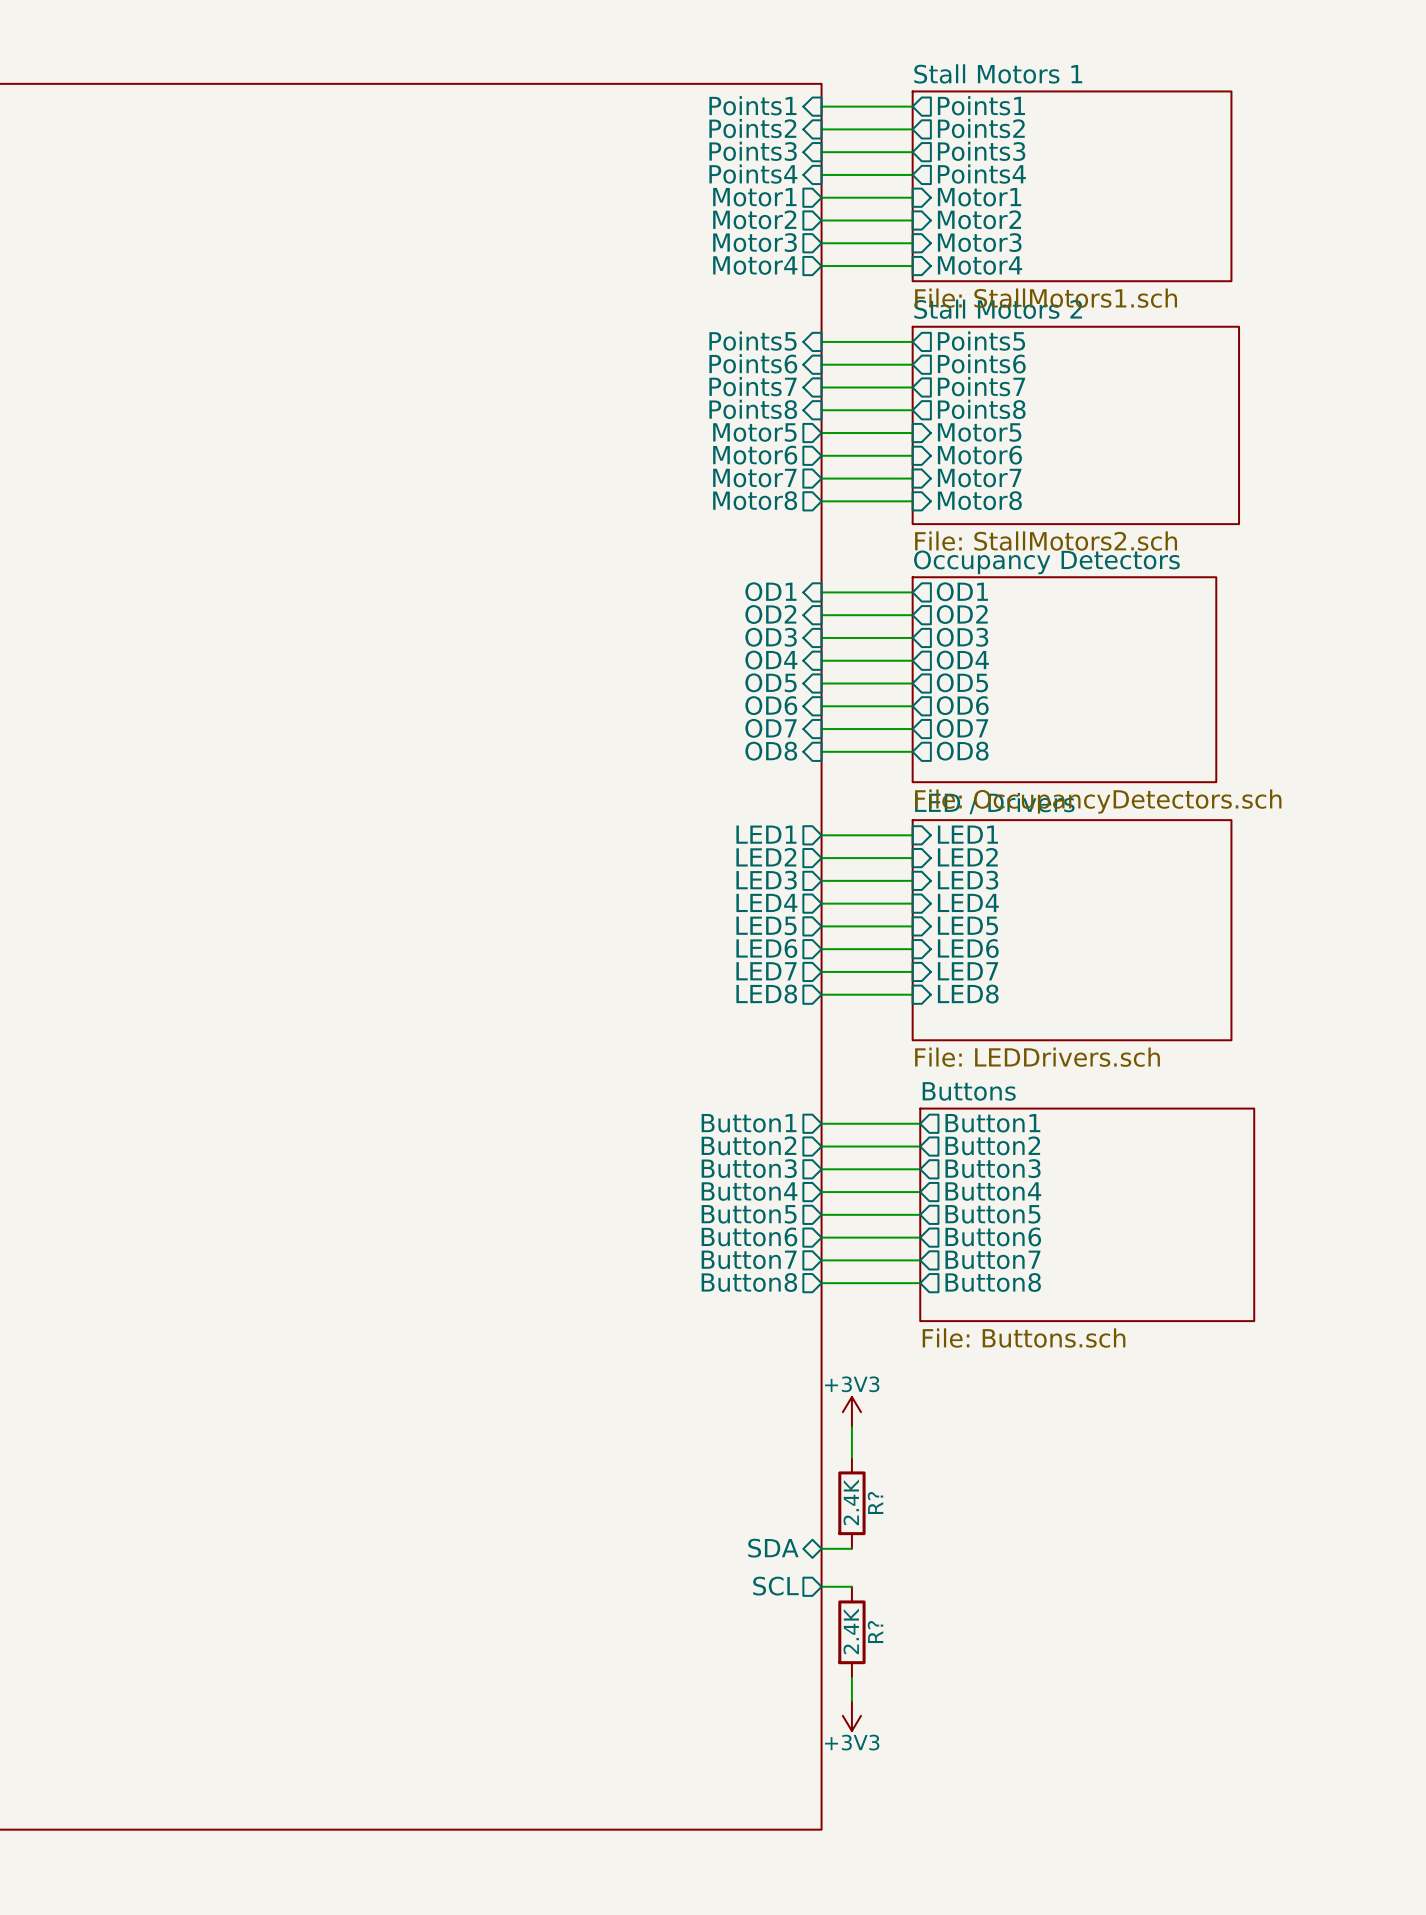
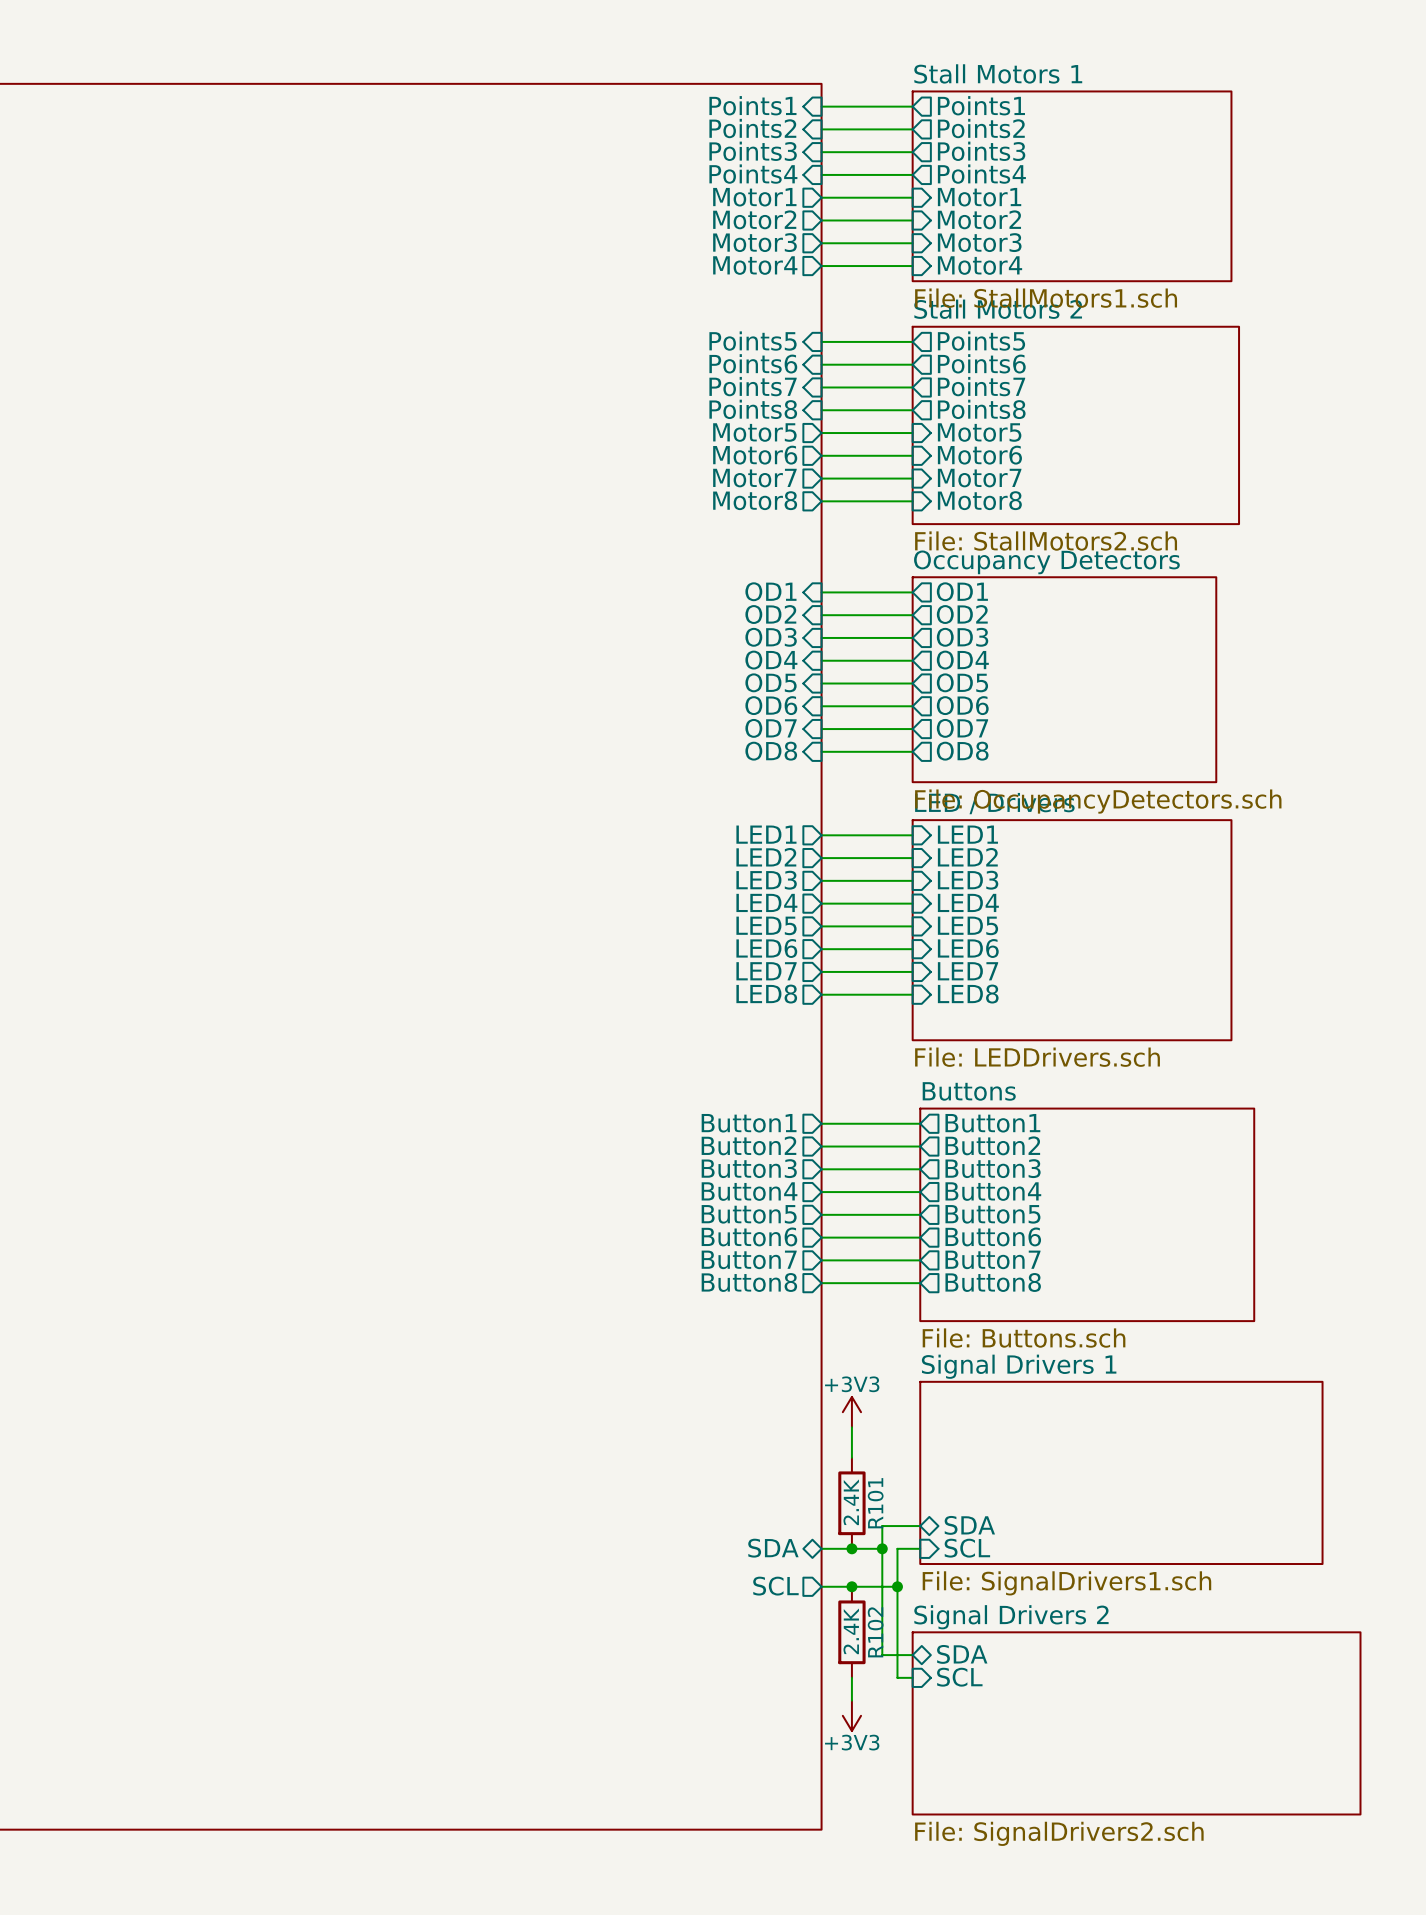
sheet Signal Drivers 1: none -> File: SignalDrivers1.sch (1121, 1472)
R? name: R? (875, 1502) -> R101 (875, 1503)
sheet pin: none -> SDA (969, 1525)
wire: none -> (920, 1526) (882, 1526) (882, 1655) (912, 1655)
wire: none -> (851, 1548) (882, 1548)
junction: none -> (851, 1548)
junction: none -> (882, 1548)
wire: none -> (920, 1548) (897, 1548) (897, 1677) (912, 1677)
sheet pin: none -> SCL (967, 1548)
wire: none -> (851, 1586) (897, 1586)
junction: none -> (851, 1586)
junction: none -> (897, 1586)
R? name: R? (875, 1632) -> R102 (875, 1632)
sheet pin: none -> SDA (962, 1654)
sheet pin: none -> SCL (959, 1677)
sheet Signal Drivers 2: none -> File: SignalDrivers2.sch (1136, 1723)

